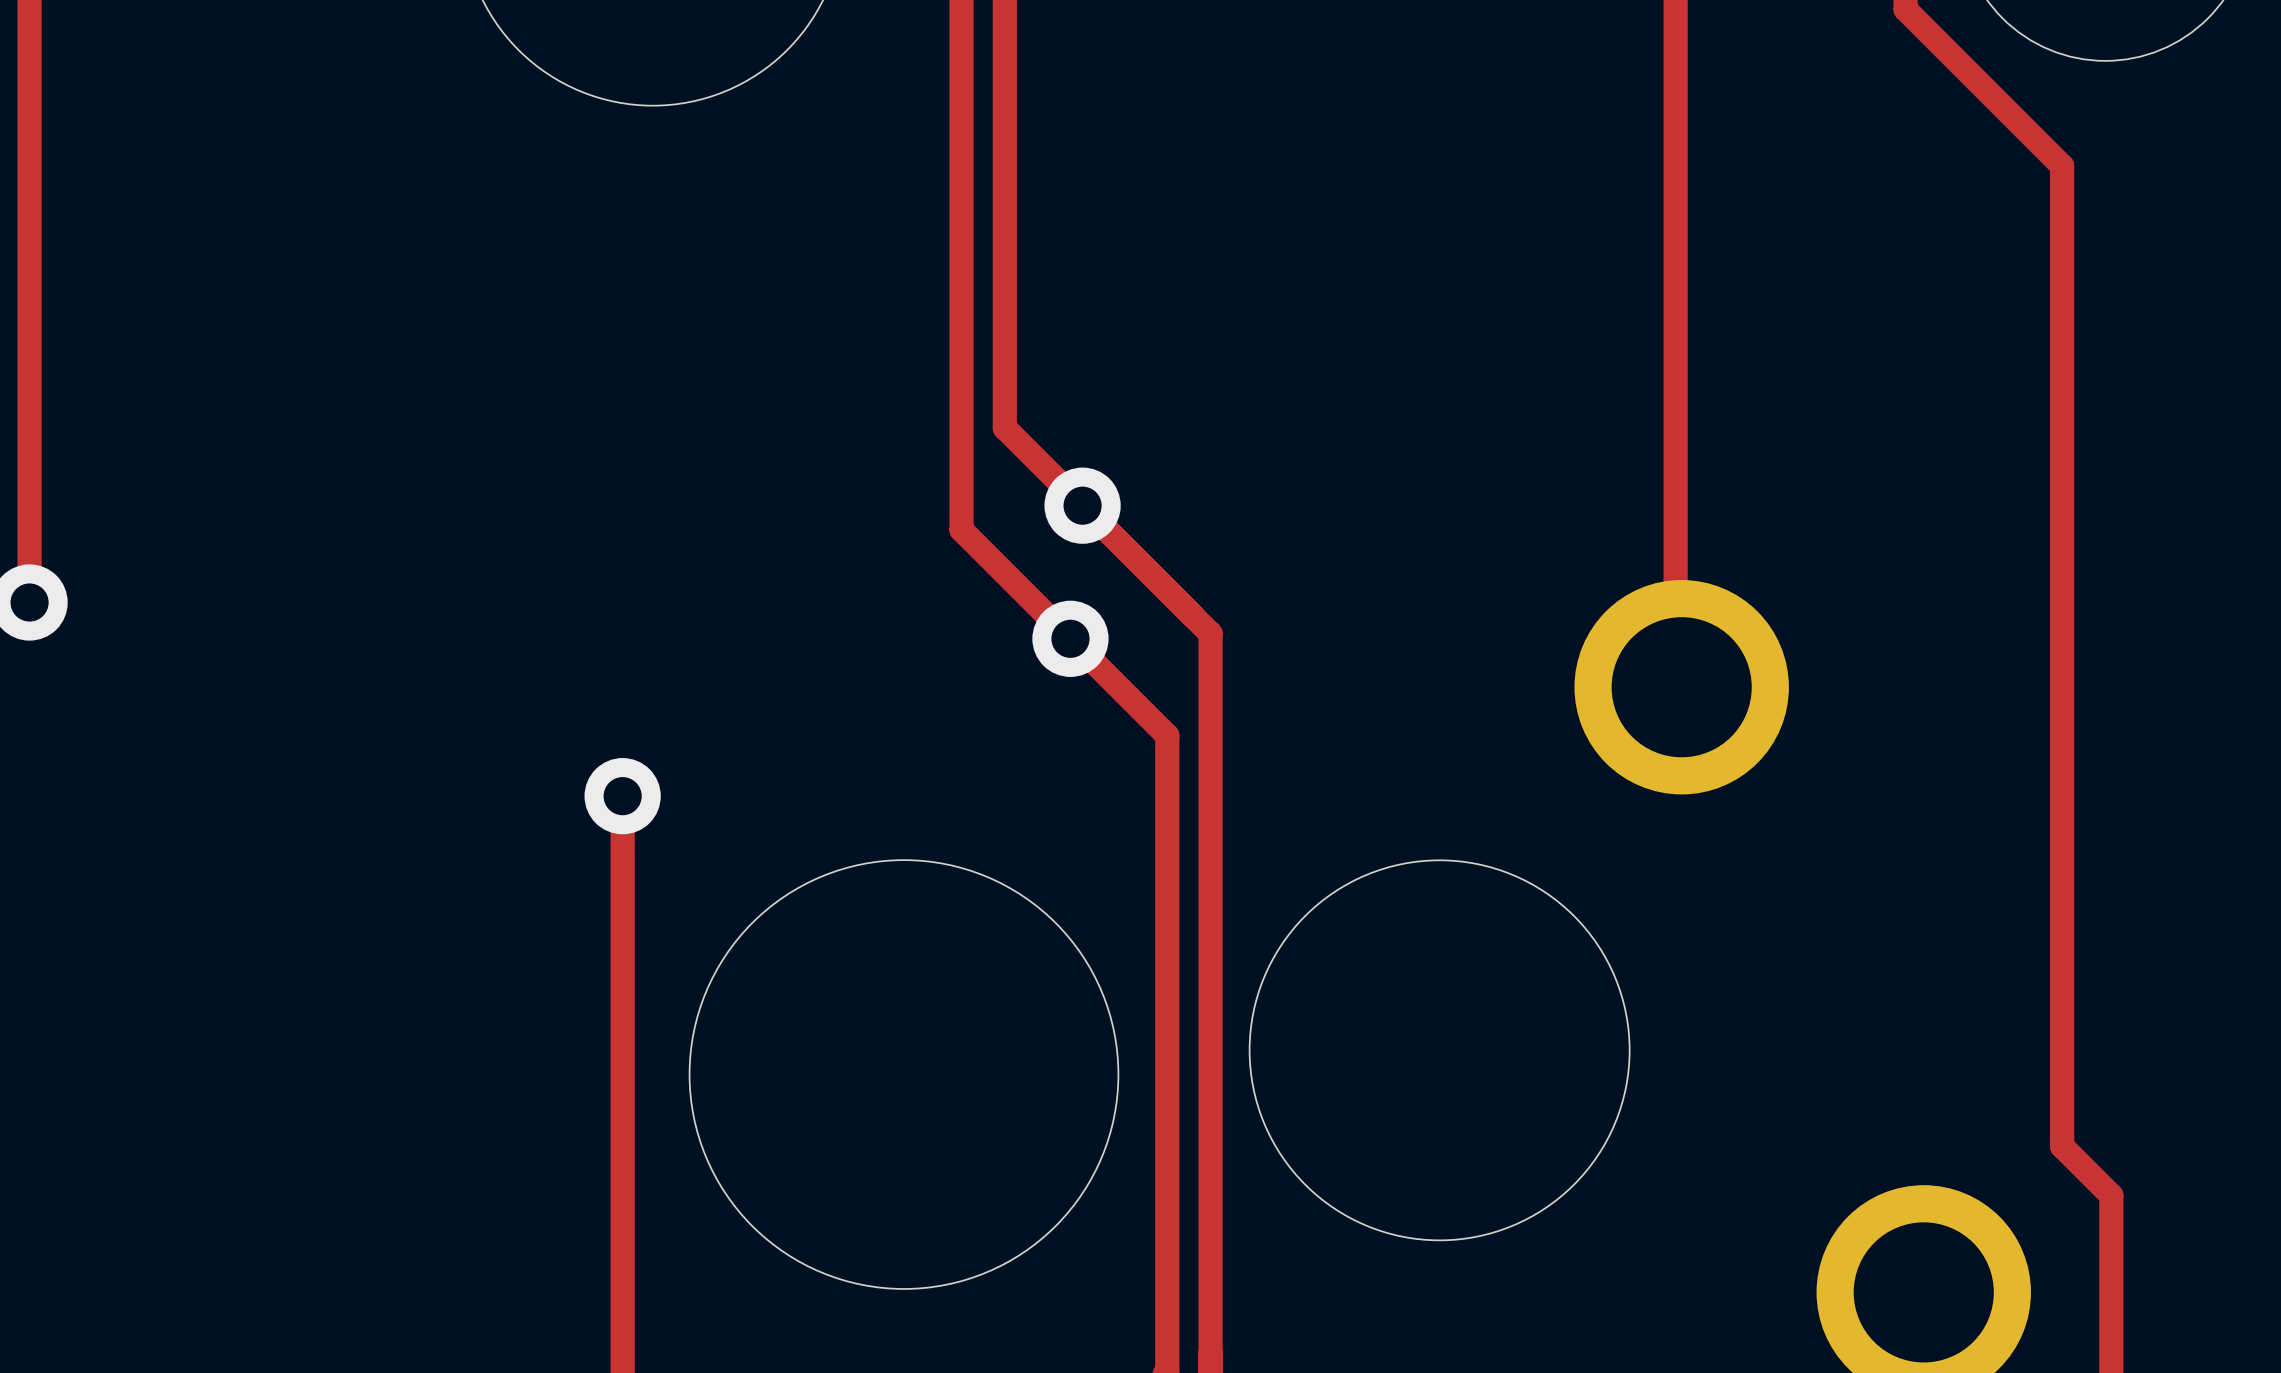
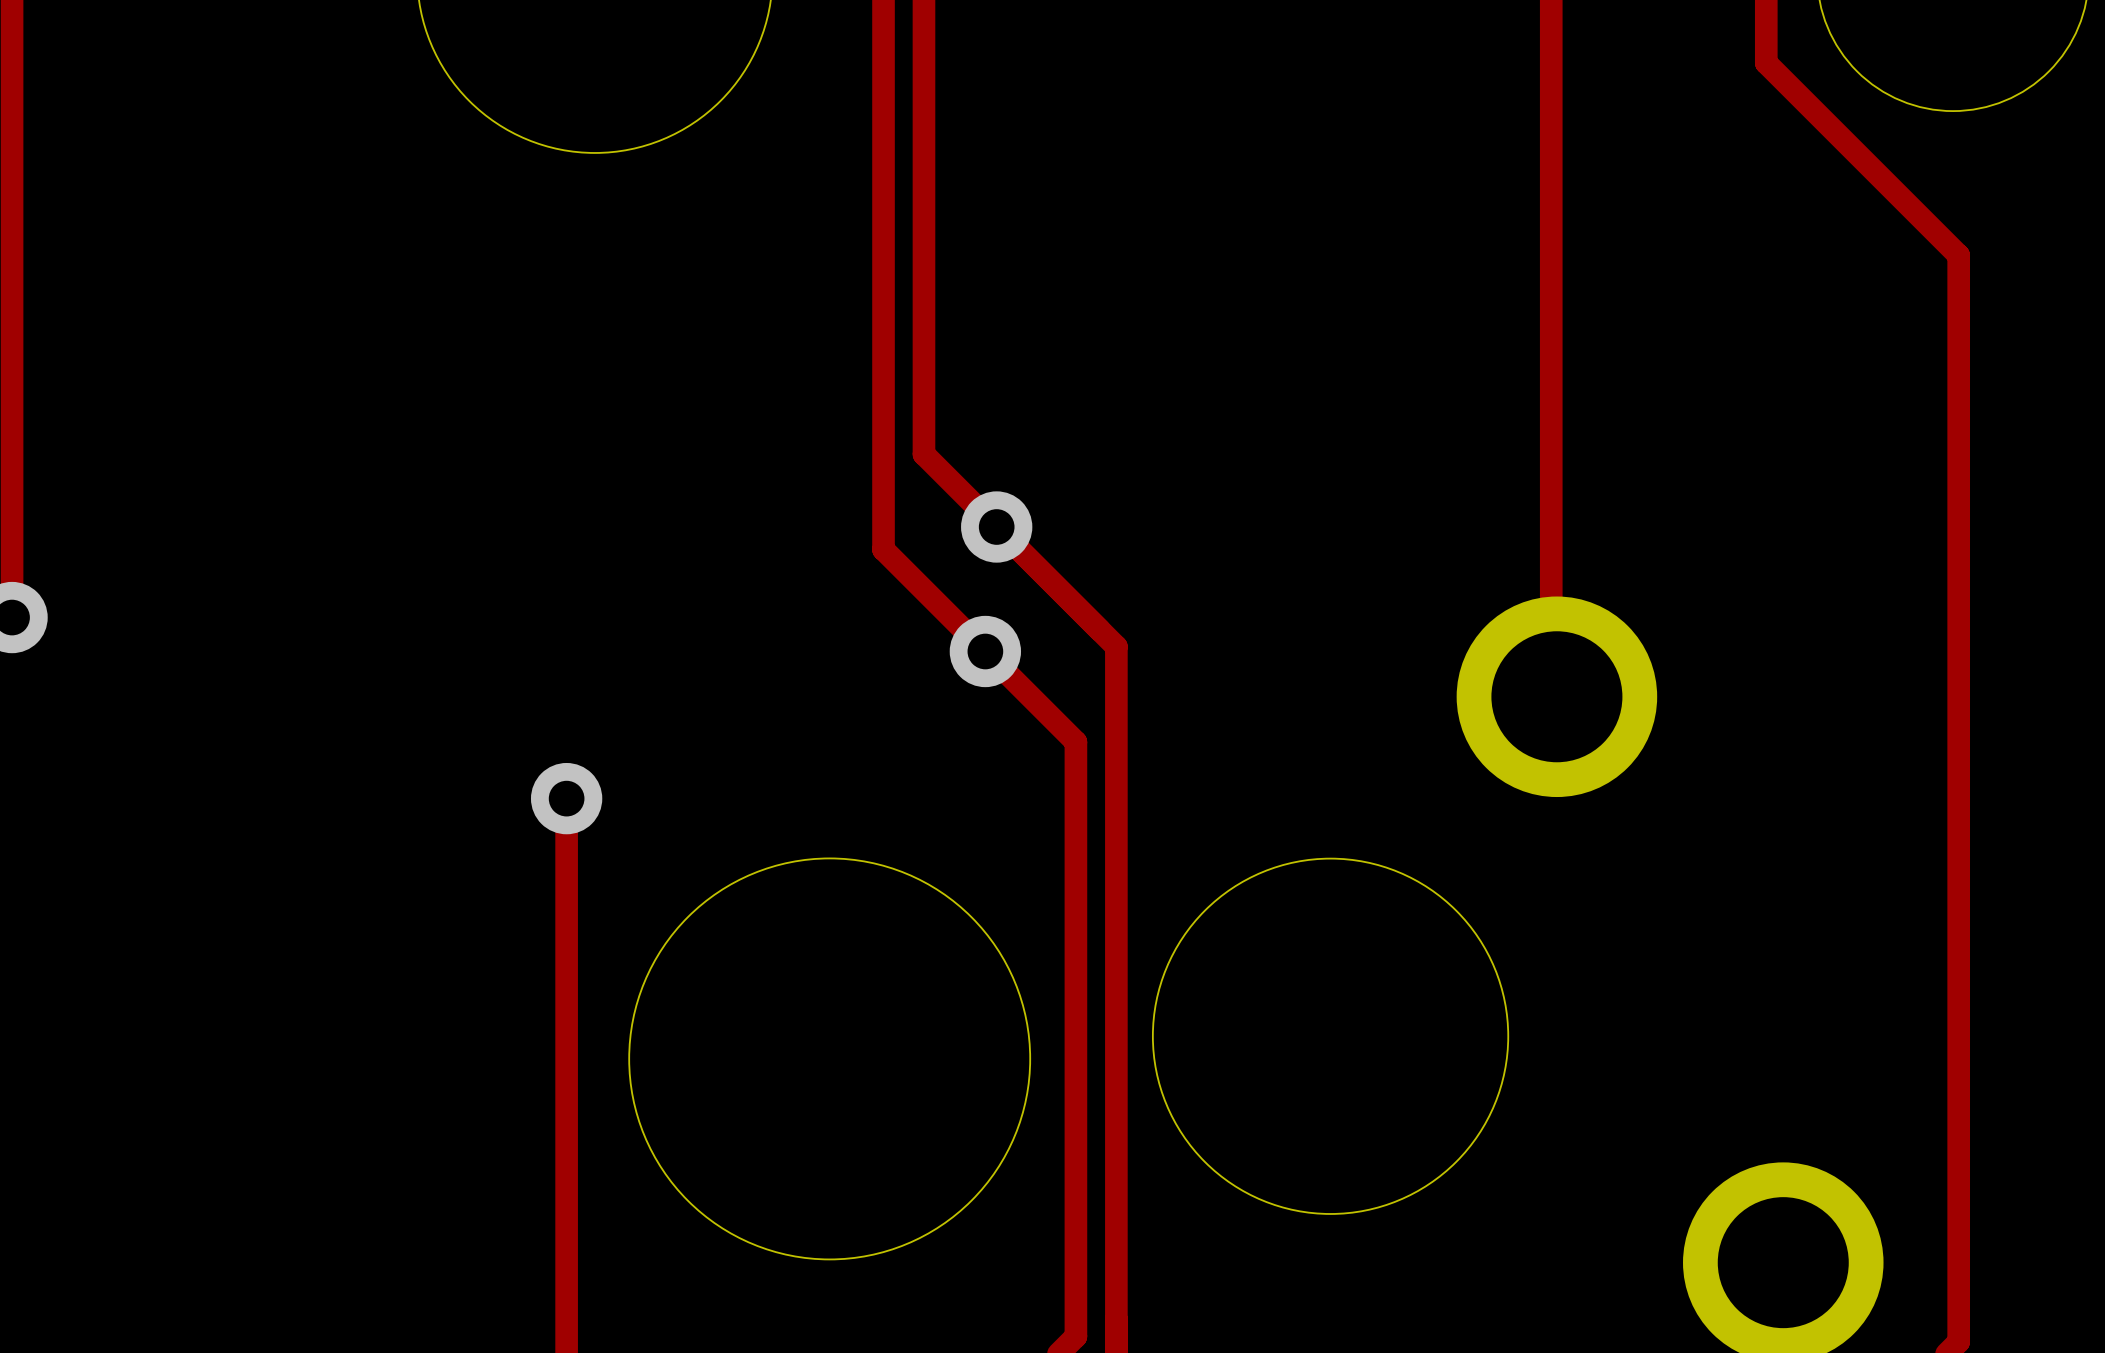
track: (2062, 165) (2062, 1146) (2111, 1195) -> (1912, 209) (1958, 255) (1958, 1172)

